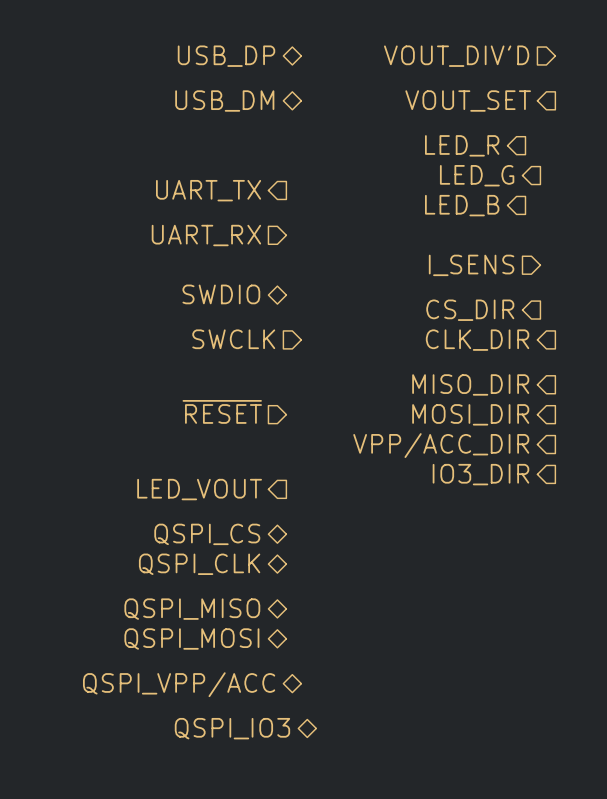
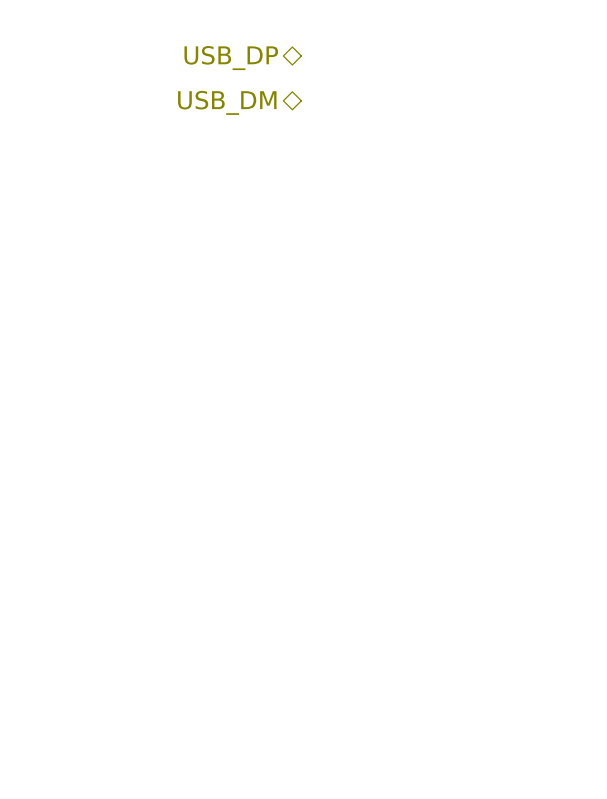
hierarchical label: VOUT_DIV'D (456, 56) -> none
hierarchical label: VOUT_SET (468, 101) -> none
hierarchical label: LED_R (462, 145) -> none
hierarchical label: LED_G (477, 175) -> none
hierarchical label: UART_TX (208, 190) -> none
hierarchical label: LED_B (462, 205) -> none
hierarchical label: UART_RX (206, 235) -> none
hierarchical label: I_SENS (471, 265) -> none
hierarchical label: SWDIO (221, 294) -> none
hierarchical label: CS_DIR (470, 310) -> none
hierarchical label: SWCLK (233, 339) -> none
hierarchical label: CLK_DIR (477, 340) -> none
hierarchical label: MISO_DIR (470, 384) -> none
hierarchical label: ~{RESET} (222, 411) -> none
hierarchical label: MOSI_DIR (470, 414) -> none
hierarchical label: VPP/ACC_DIR (441, 445) -> none
hierarchical label: IO3_DIR (480, 474) -> none
hierarchical label: LED_VOUT (199, 489) -> none
hierarchical label: QSPI_CS (207, 534) -> none
hierarchical label: QSPI_CLK (199, 564) -> none
hierarchical label: QSPI_MISO (192, 609) -> none
hierarchical label: QSPI_MOSI (191, 638) -> none
hierarchical label: QSPI_VPP/ACC (179, 684) -> none
hierarchical label: QSPI_IO3 (232, 728) -> none

